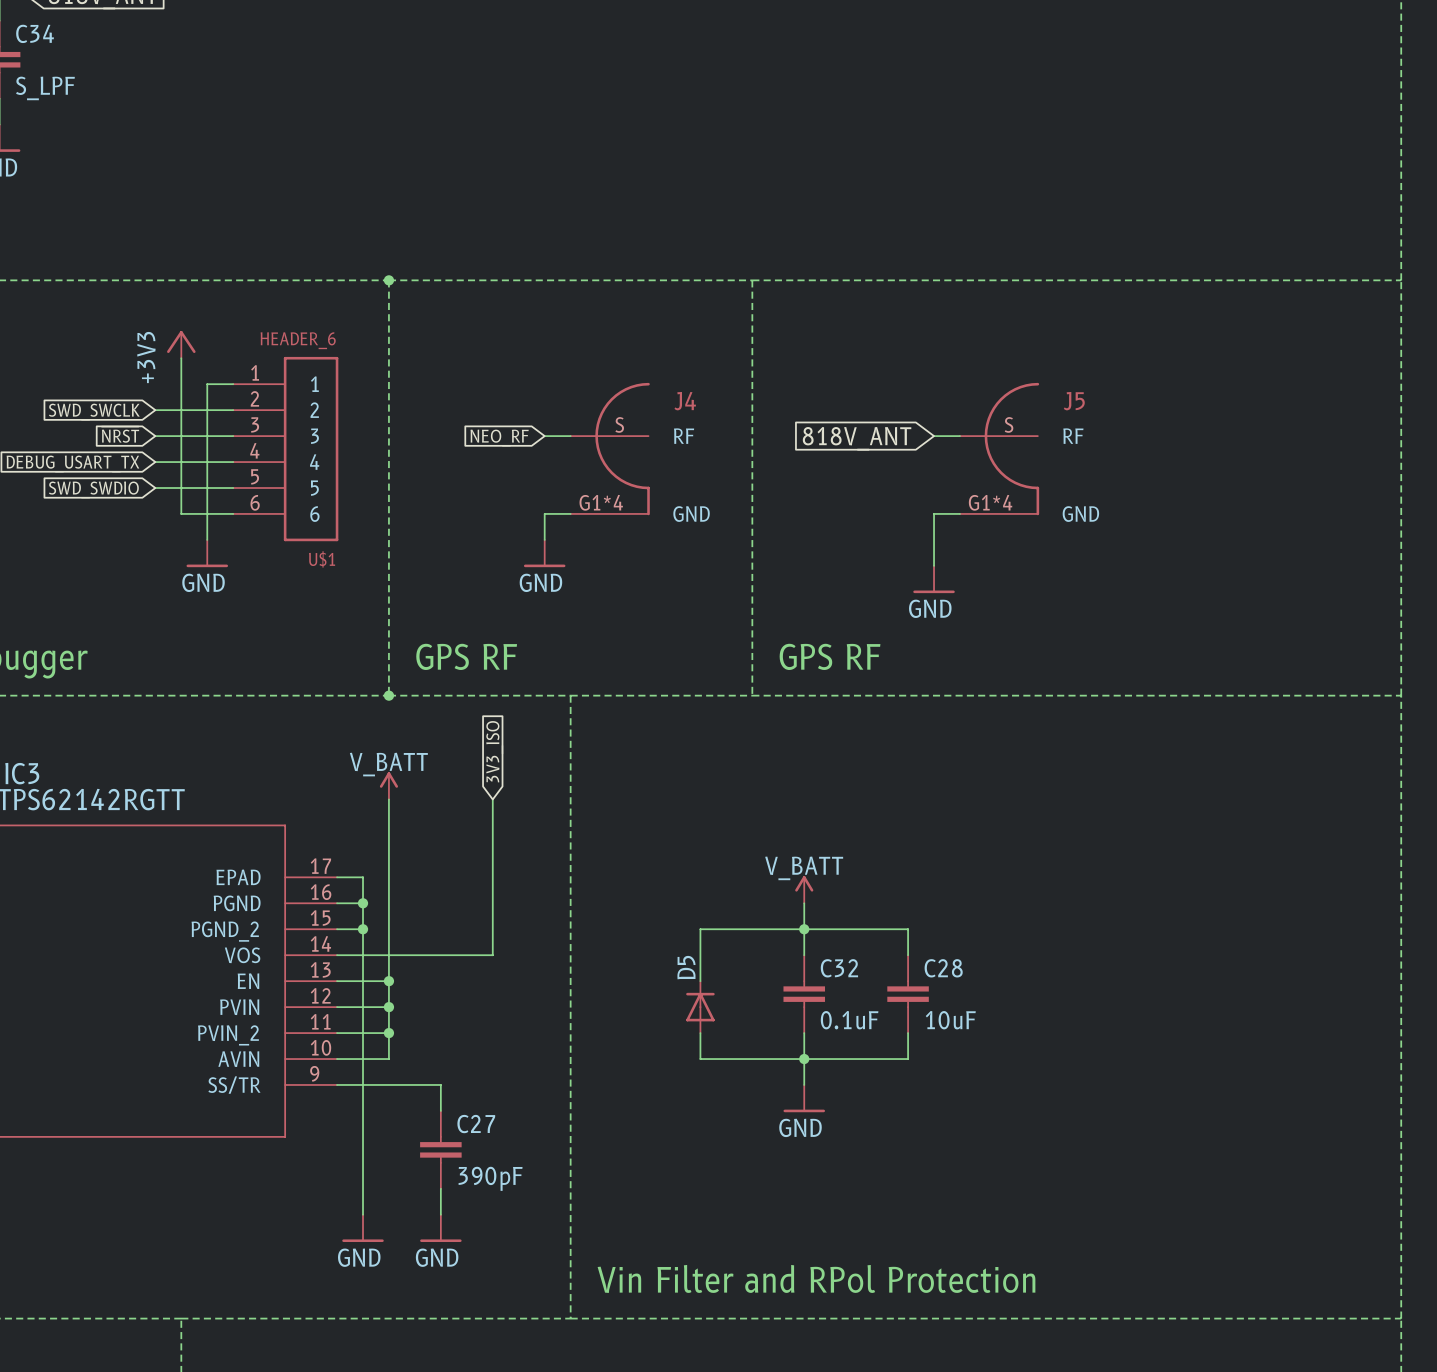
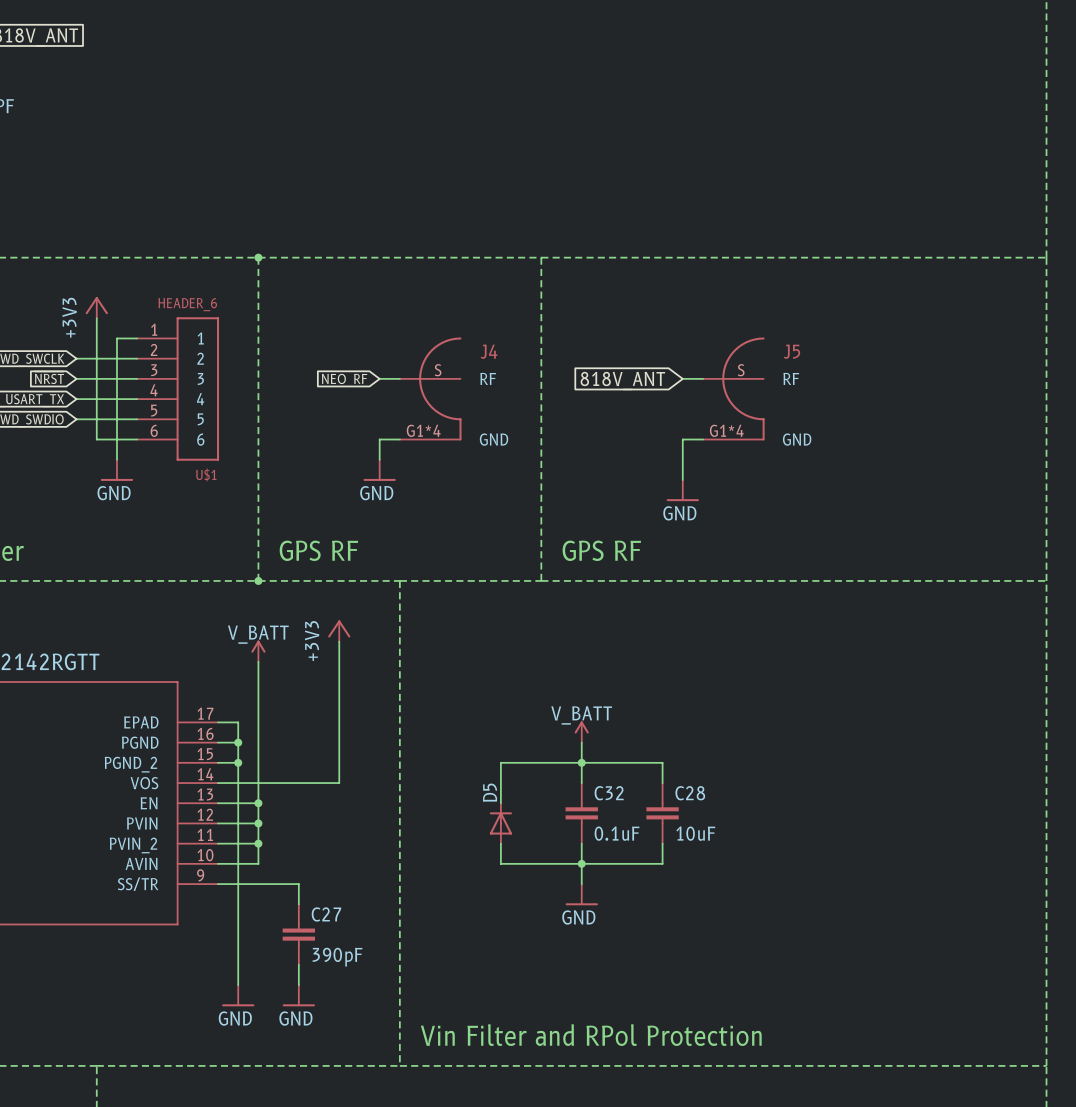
global label: 3V3_ISO (494, 751) -> none
power symbol: none -> +3V3 (339, 630)
wire: none -> (339, 641) (339, 661)

